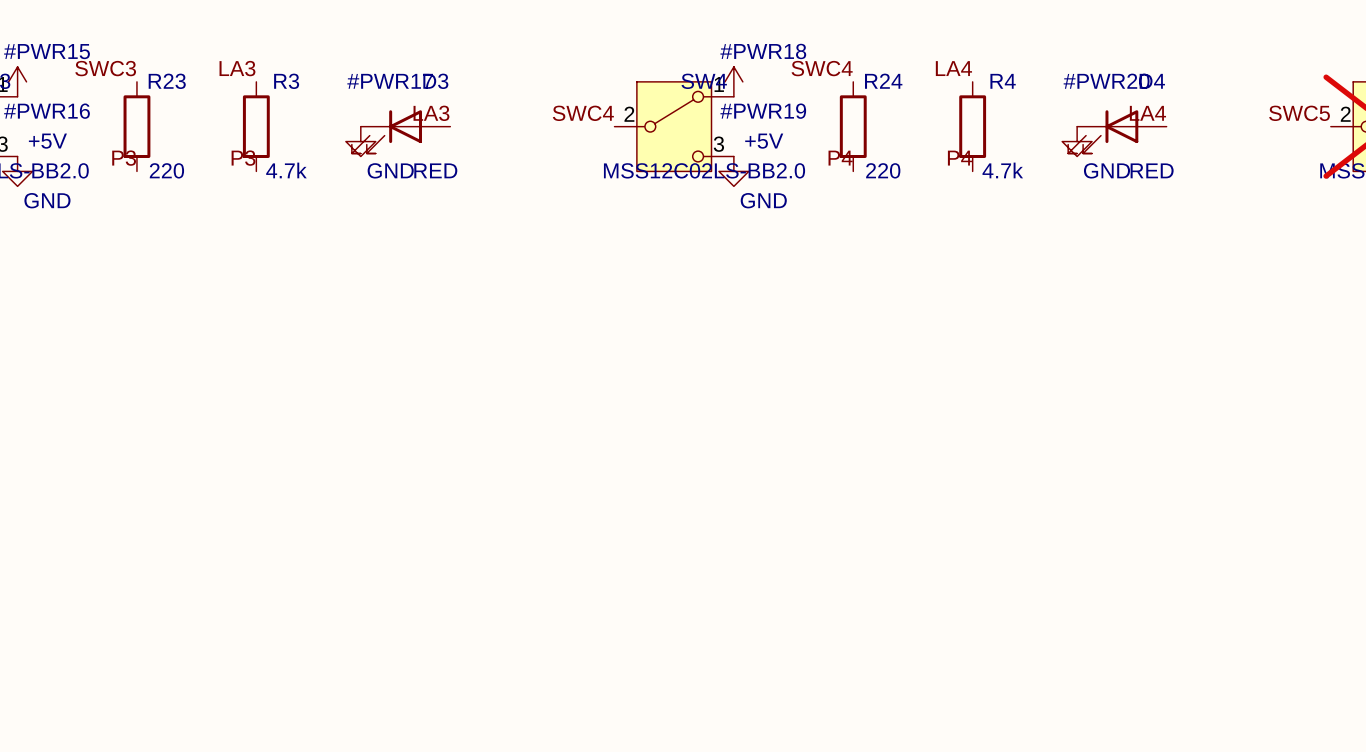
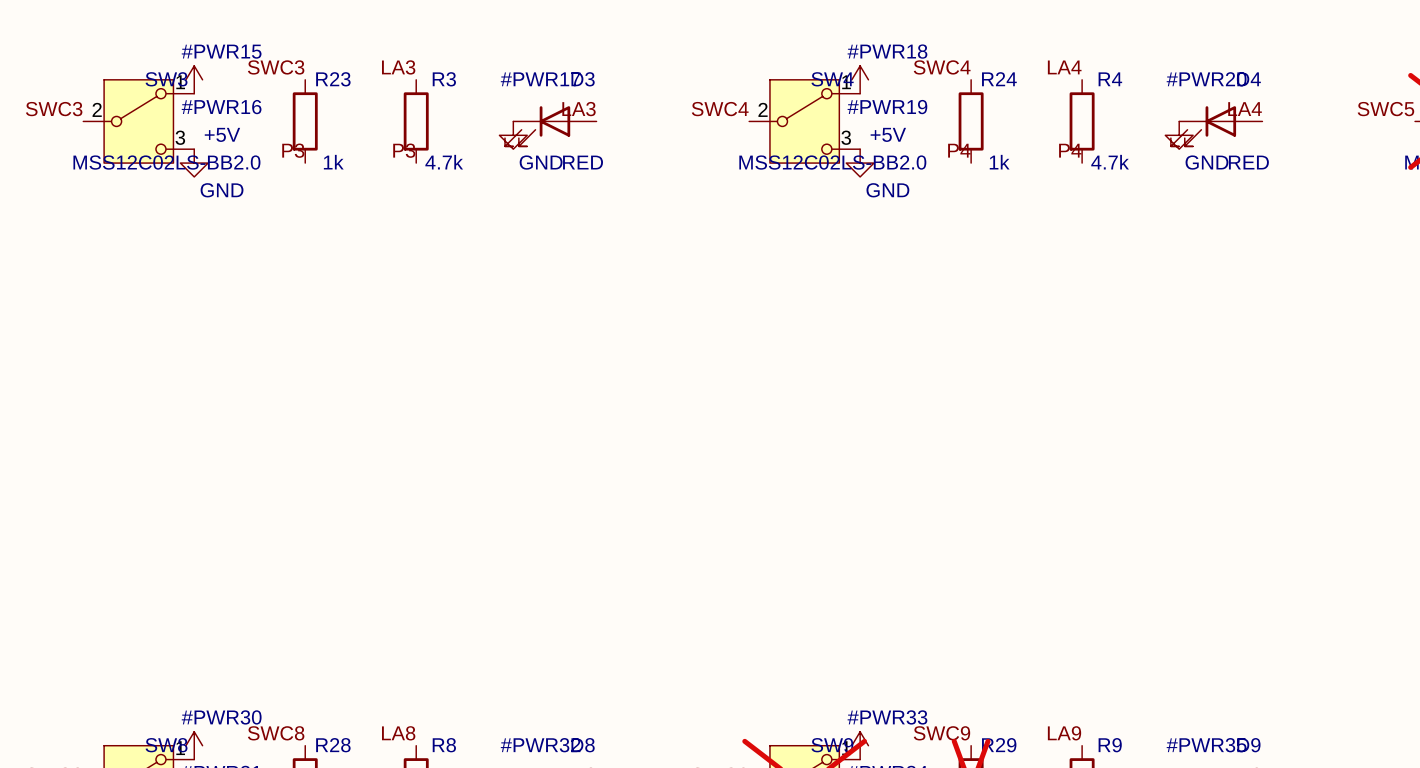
R23 value: 220 (166, 170) -> 1k (333, 162)
R24 value: 220 (883, 170) -> 1k (999, 162)

